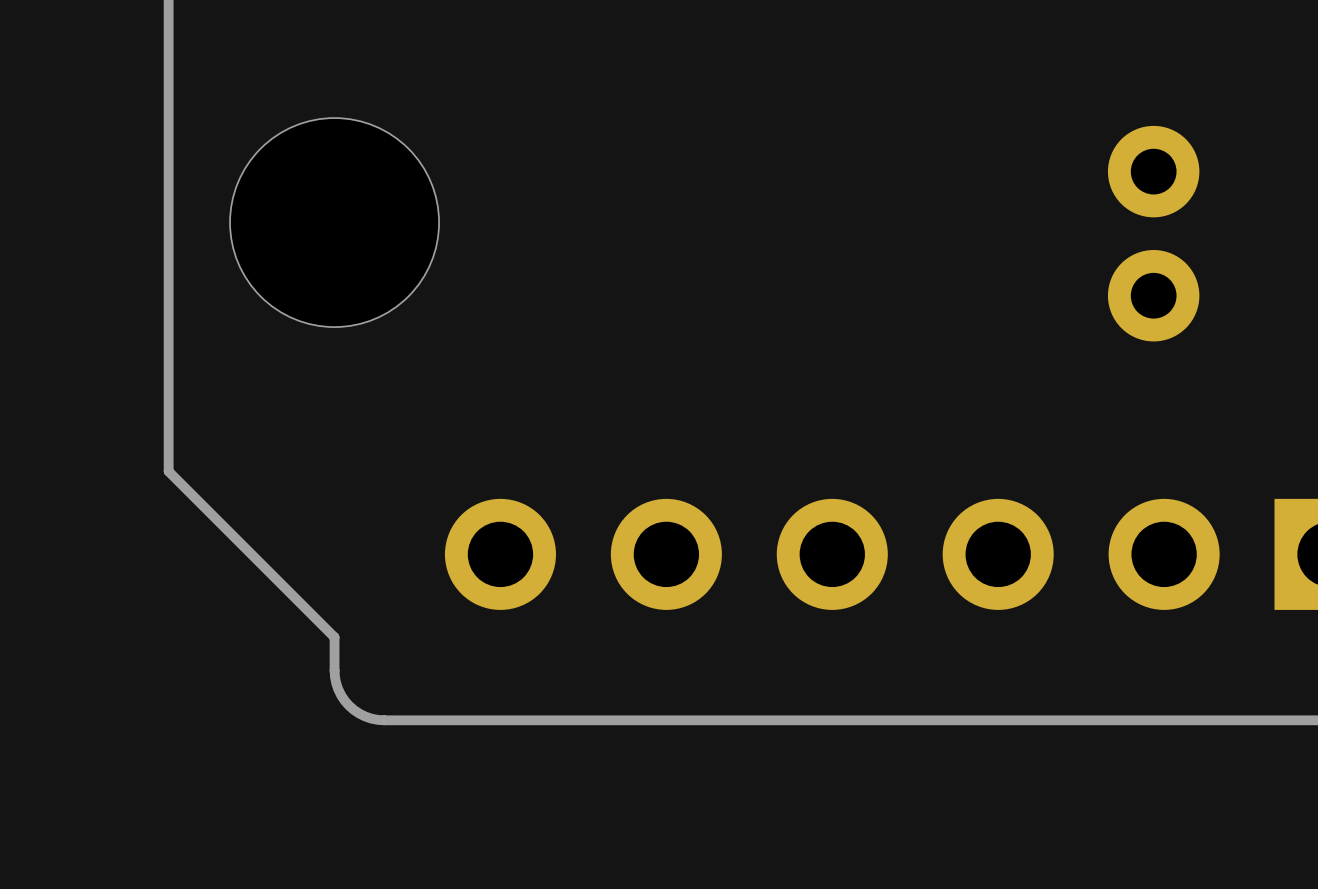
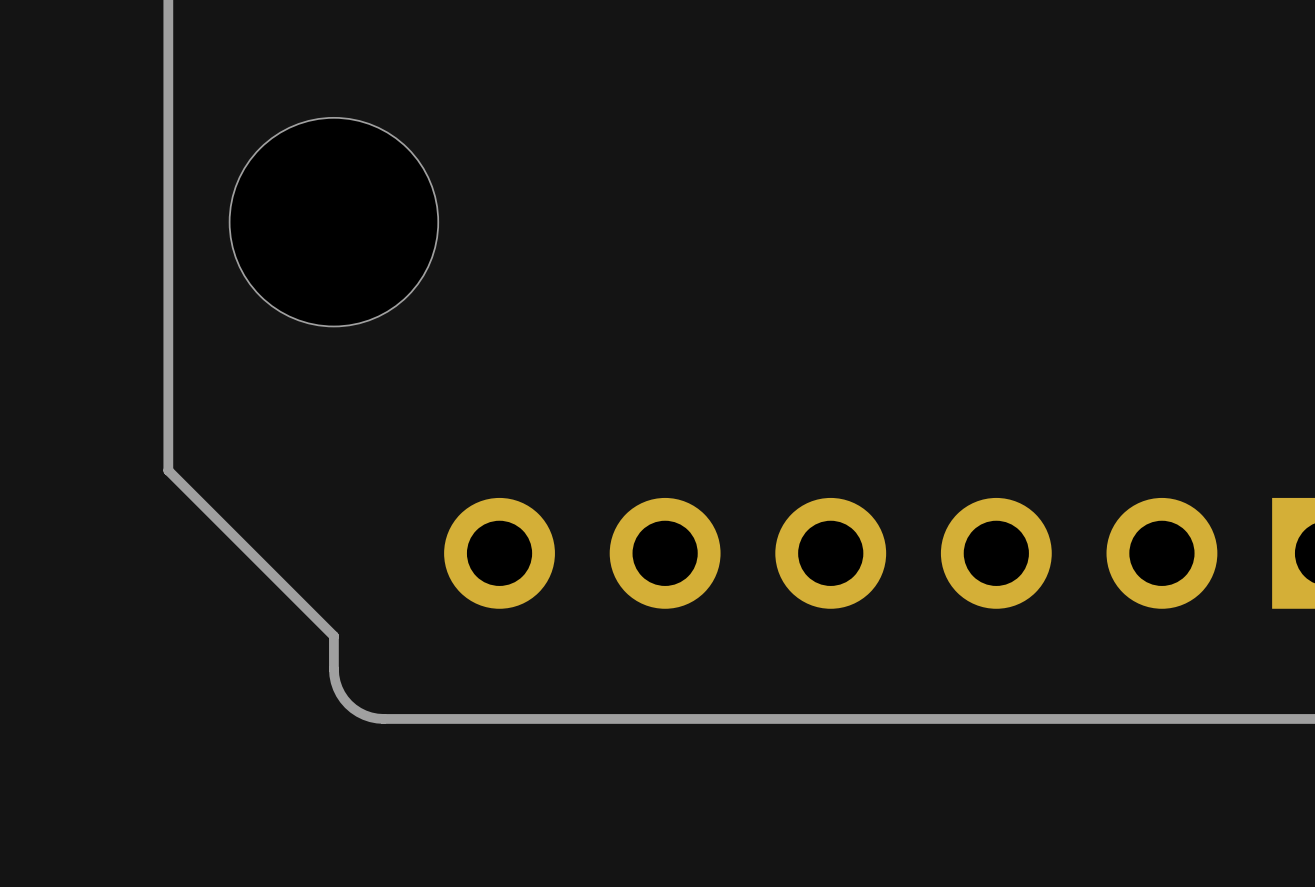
part: (1153, 233) -> none

